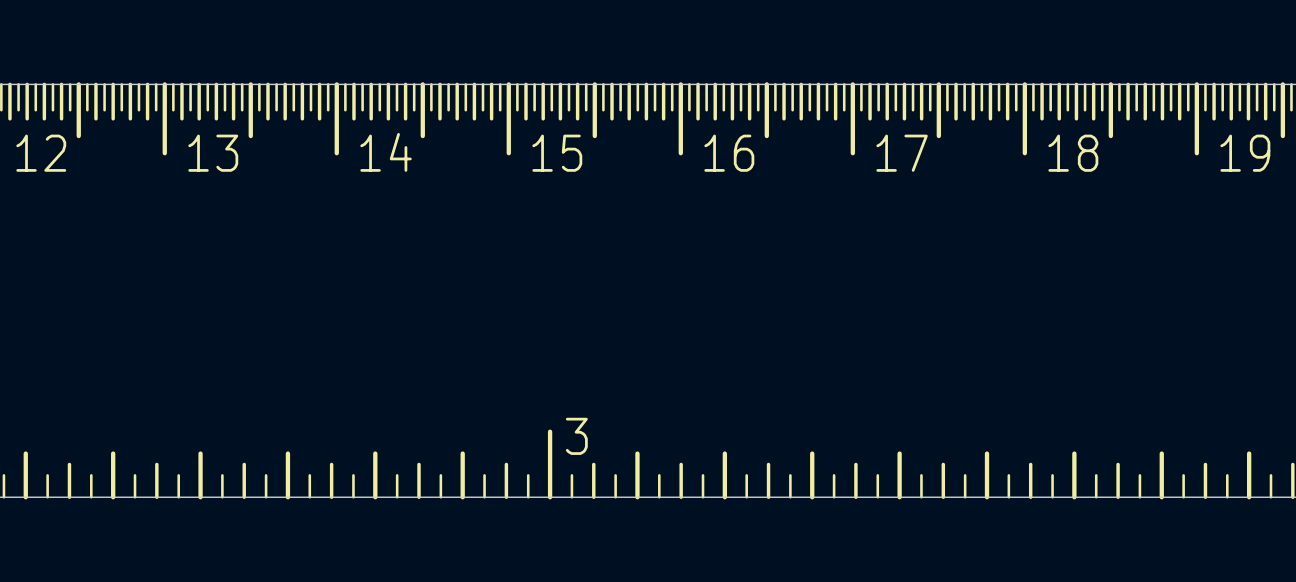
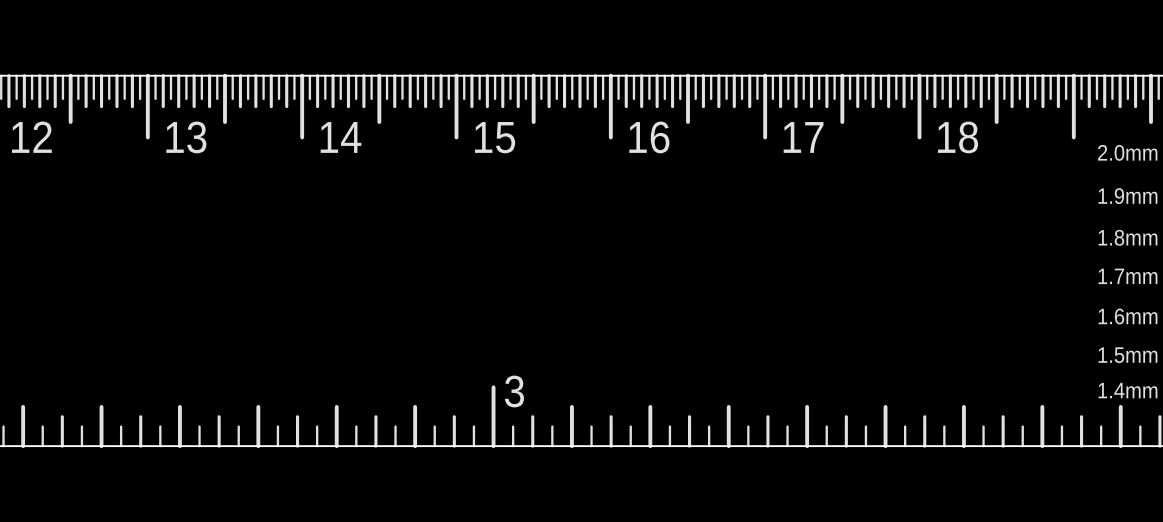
text: 19 (1245, 153) -> none
text: none -> 2.0mm (1127, 152)
text: none -> 1.9mm (1127, 196)
text: none -> 1.8mm (1127, 237)
text: none -> 1.7mm (1127, 276)
text: none -> 1.6mm (1127, 316)
text: none -> 1.5mm (1127, 355)
text: none -> 1.4mm (1127, 390)

